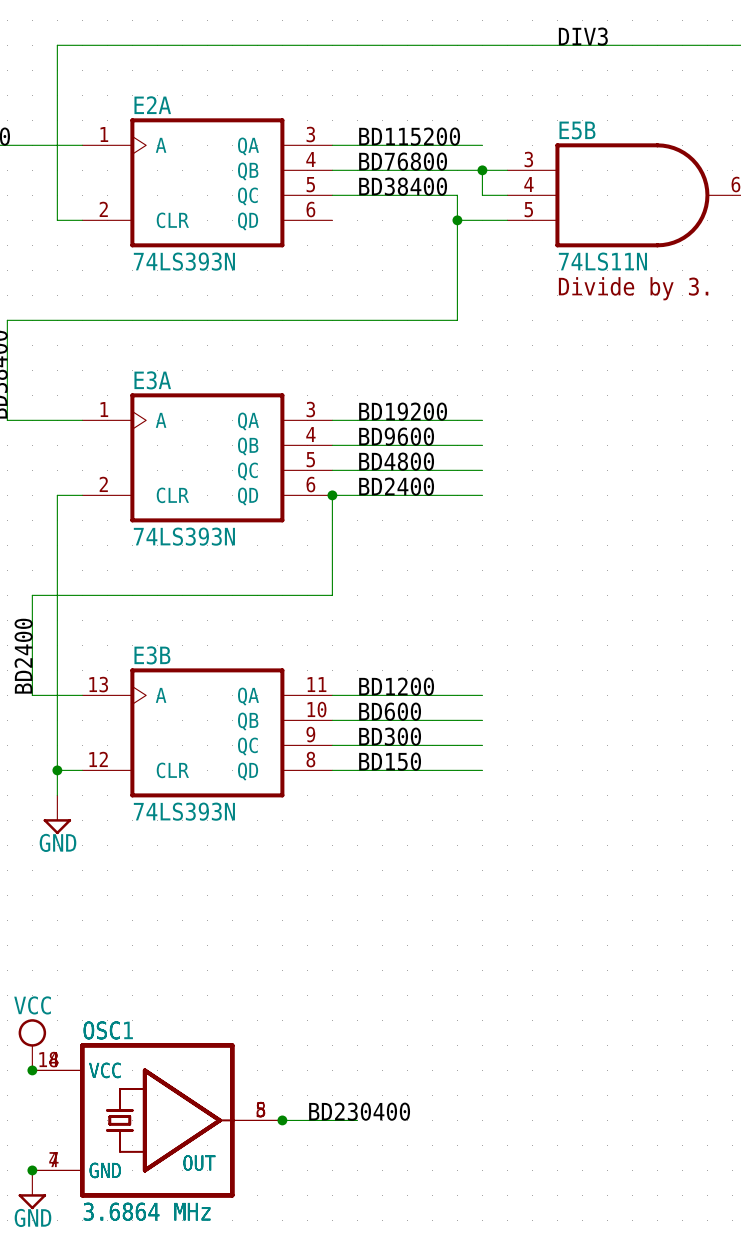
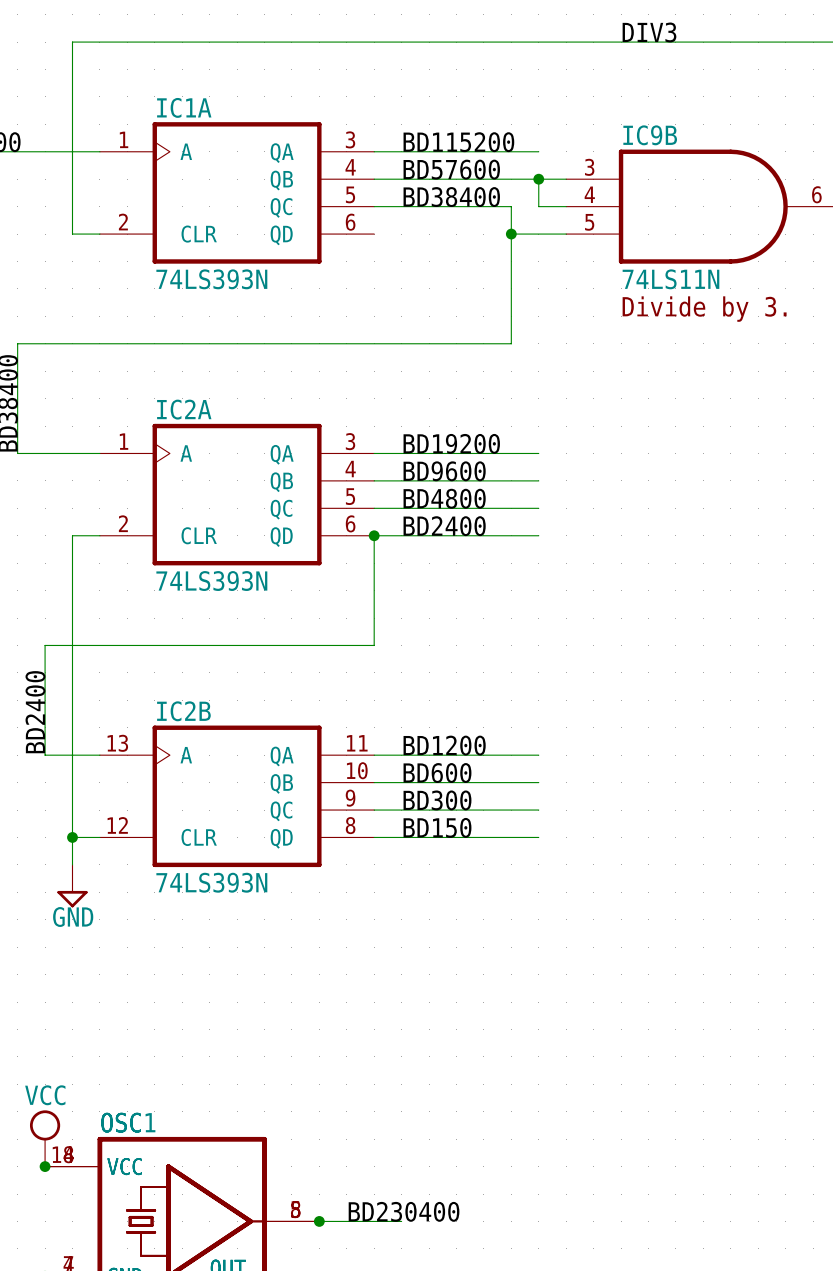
E2A name: E2A (152, 105) -> IC1A (184, 107)
E5B name: E5B (577, 130) -> IC9B (650, 135)
label: BD76800 (403, 161) -> BD57600 (451, 169)
E3A name: E3A (152, 380) -> IC2A (184, 409)
E3B name: E3B (152, 655) -> IC2B (183, 711)

